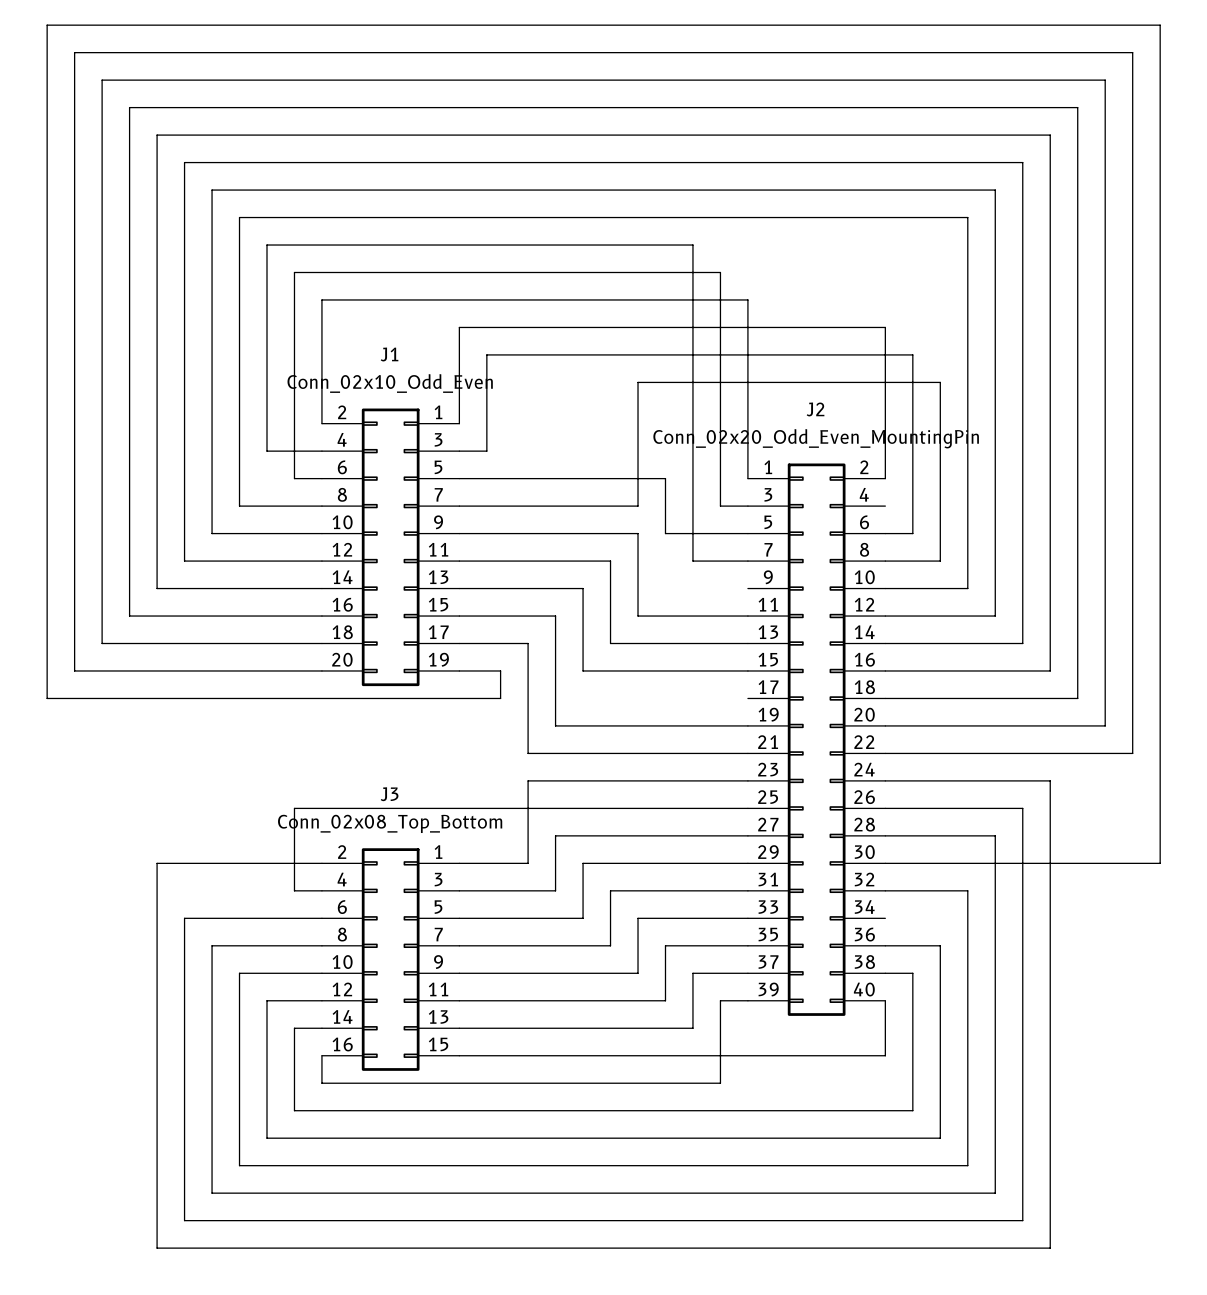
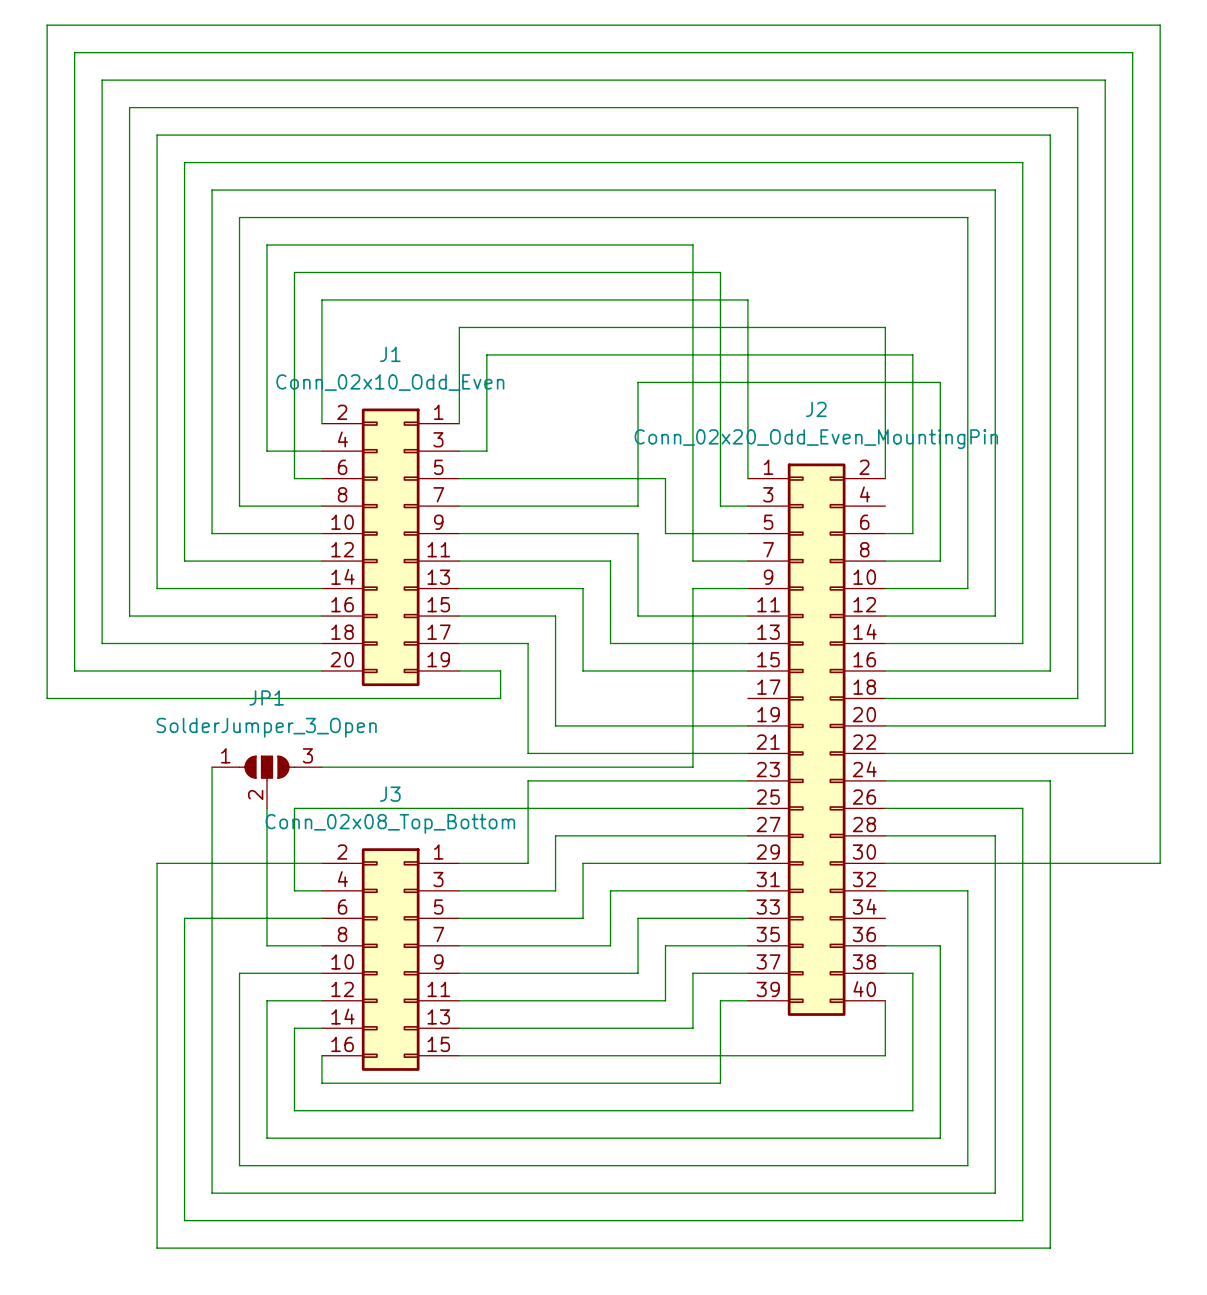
wire: none -> (747, 588) (692, 588) (692, 767) (321, 767)
wire: none -> (212, 767) (212, 945)
JP1: none -> SolderJumper_3_Open (267, 782)
wire: (212, 945) (267, 945) -> (267, 808) (267, 945)

